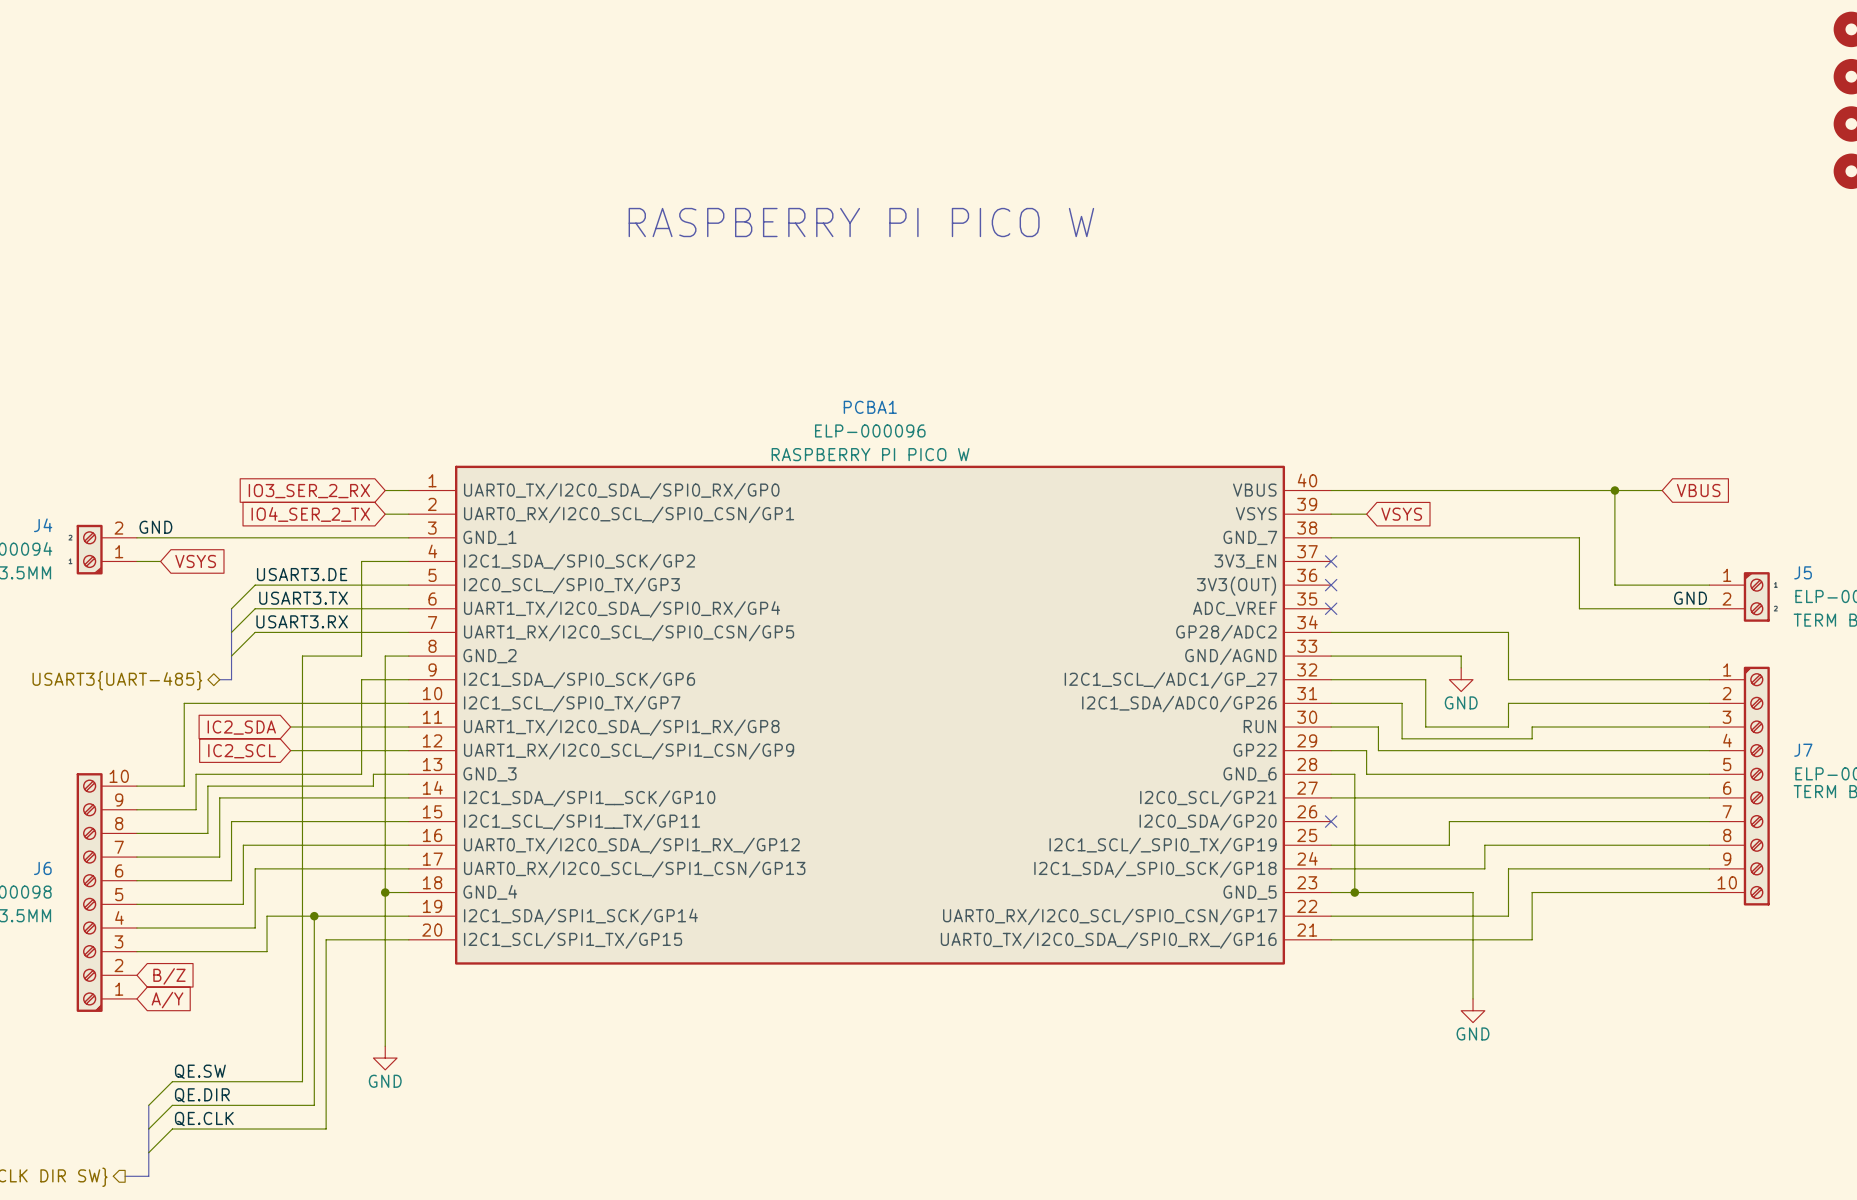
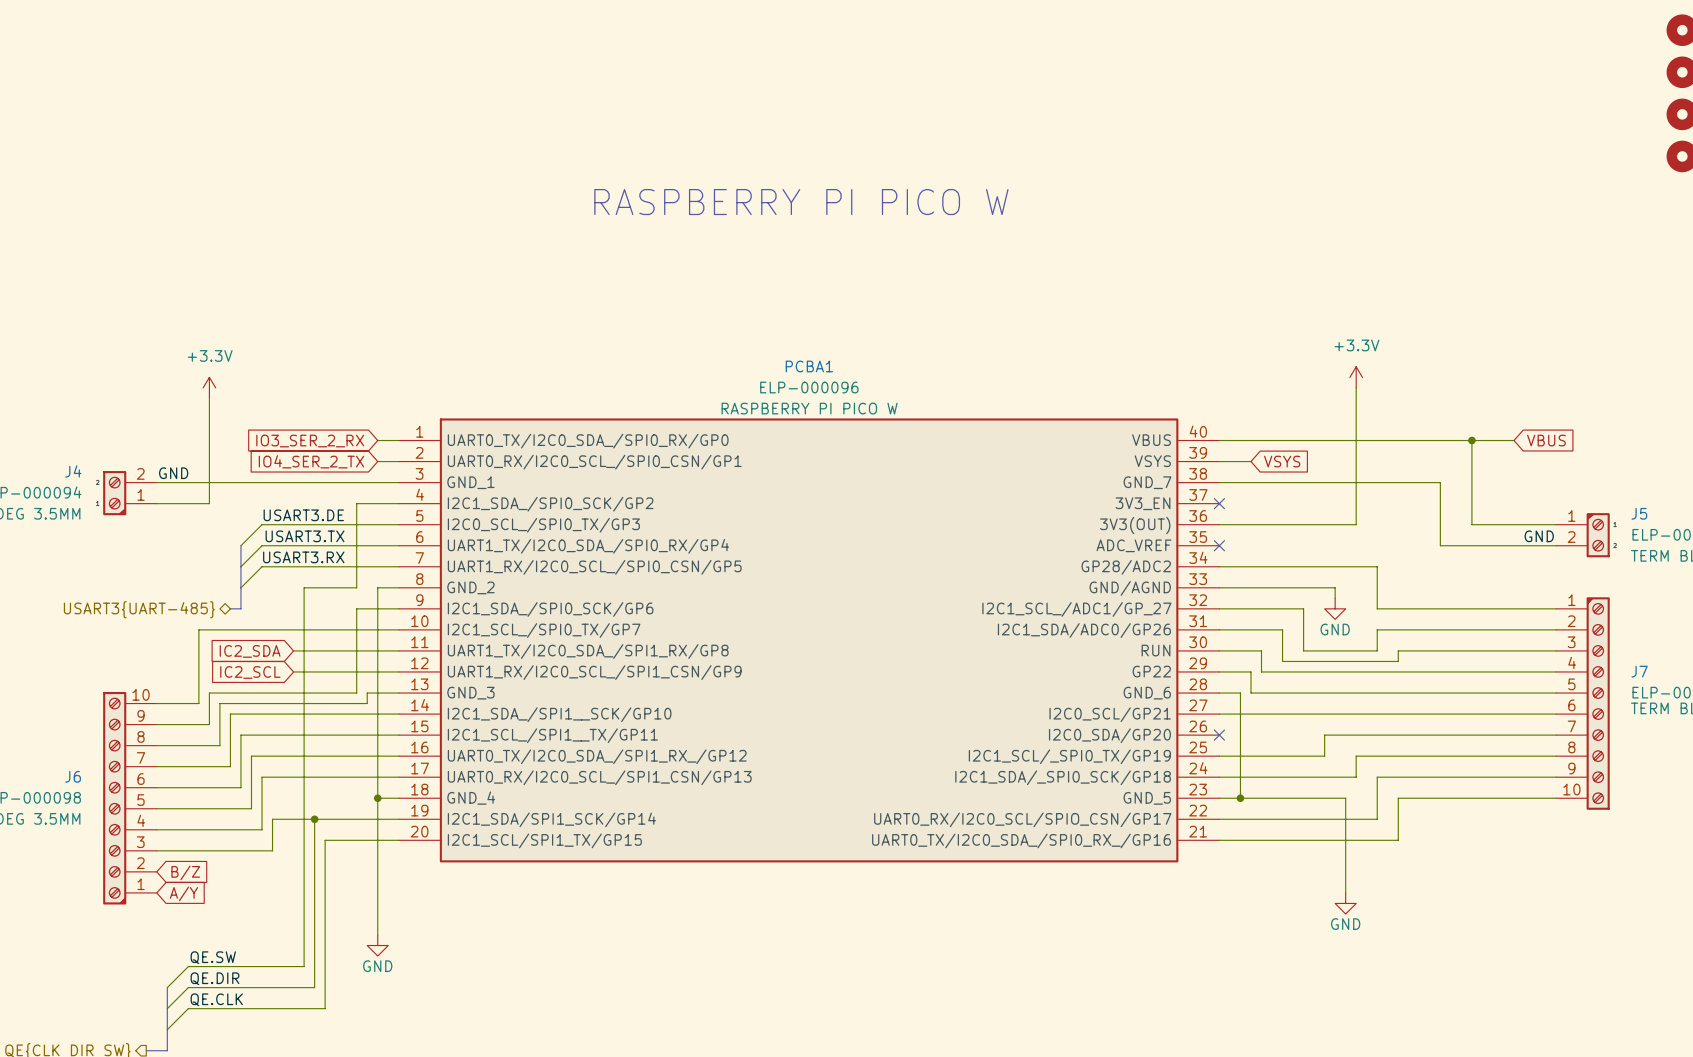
power symbol: none -> +3.3V (1356, 377)
power symbol: none -> +3.3V (209, 387)
wire: none -> (1356, 387) (1356, 524) (1219, 524)
wire: none -> (209, 398) (209, 503) (177, 503)
global label: VSYS (195, 561) -> none
no-connect mark: (1331, 585) -> none

